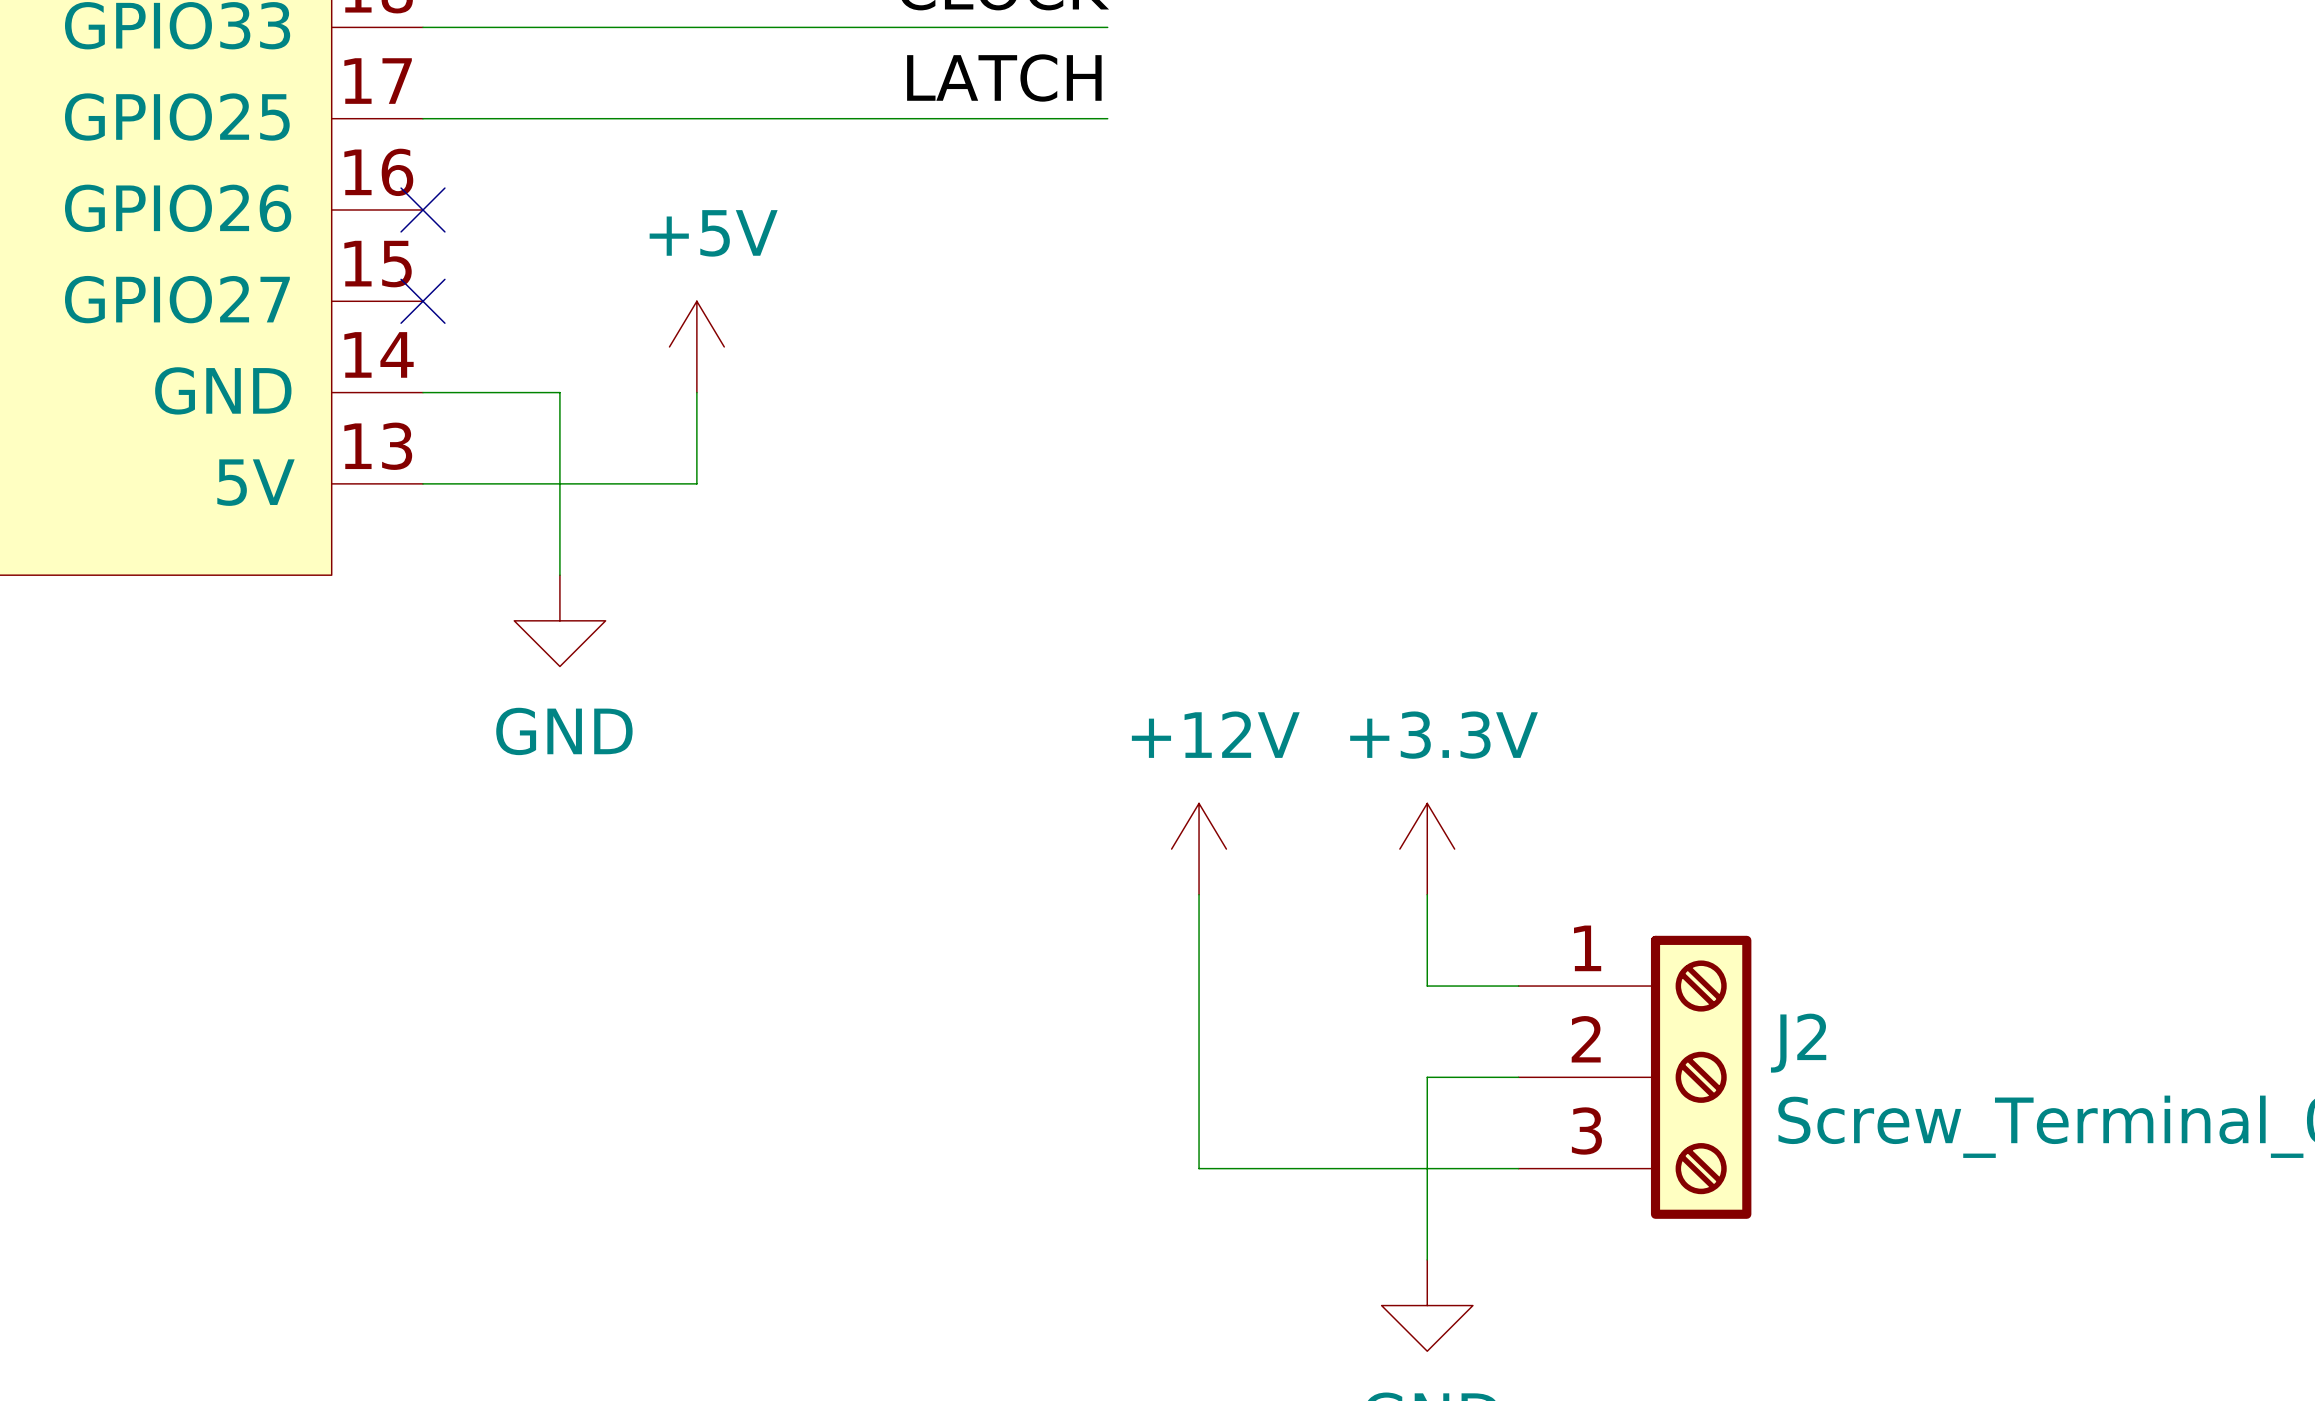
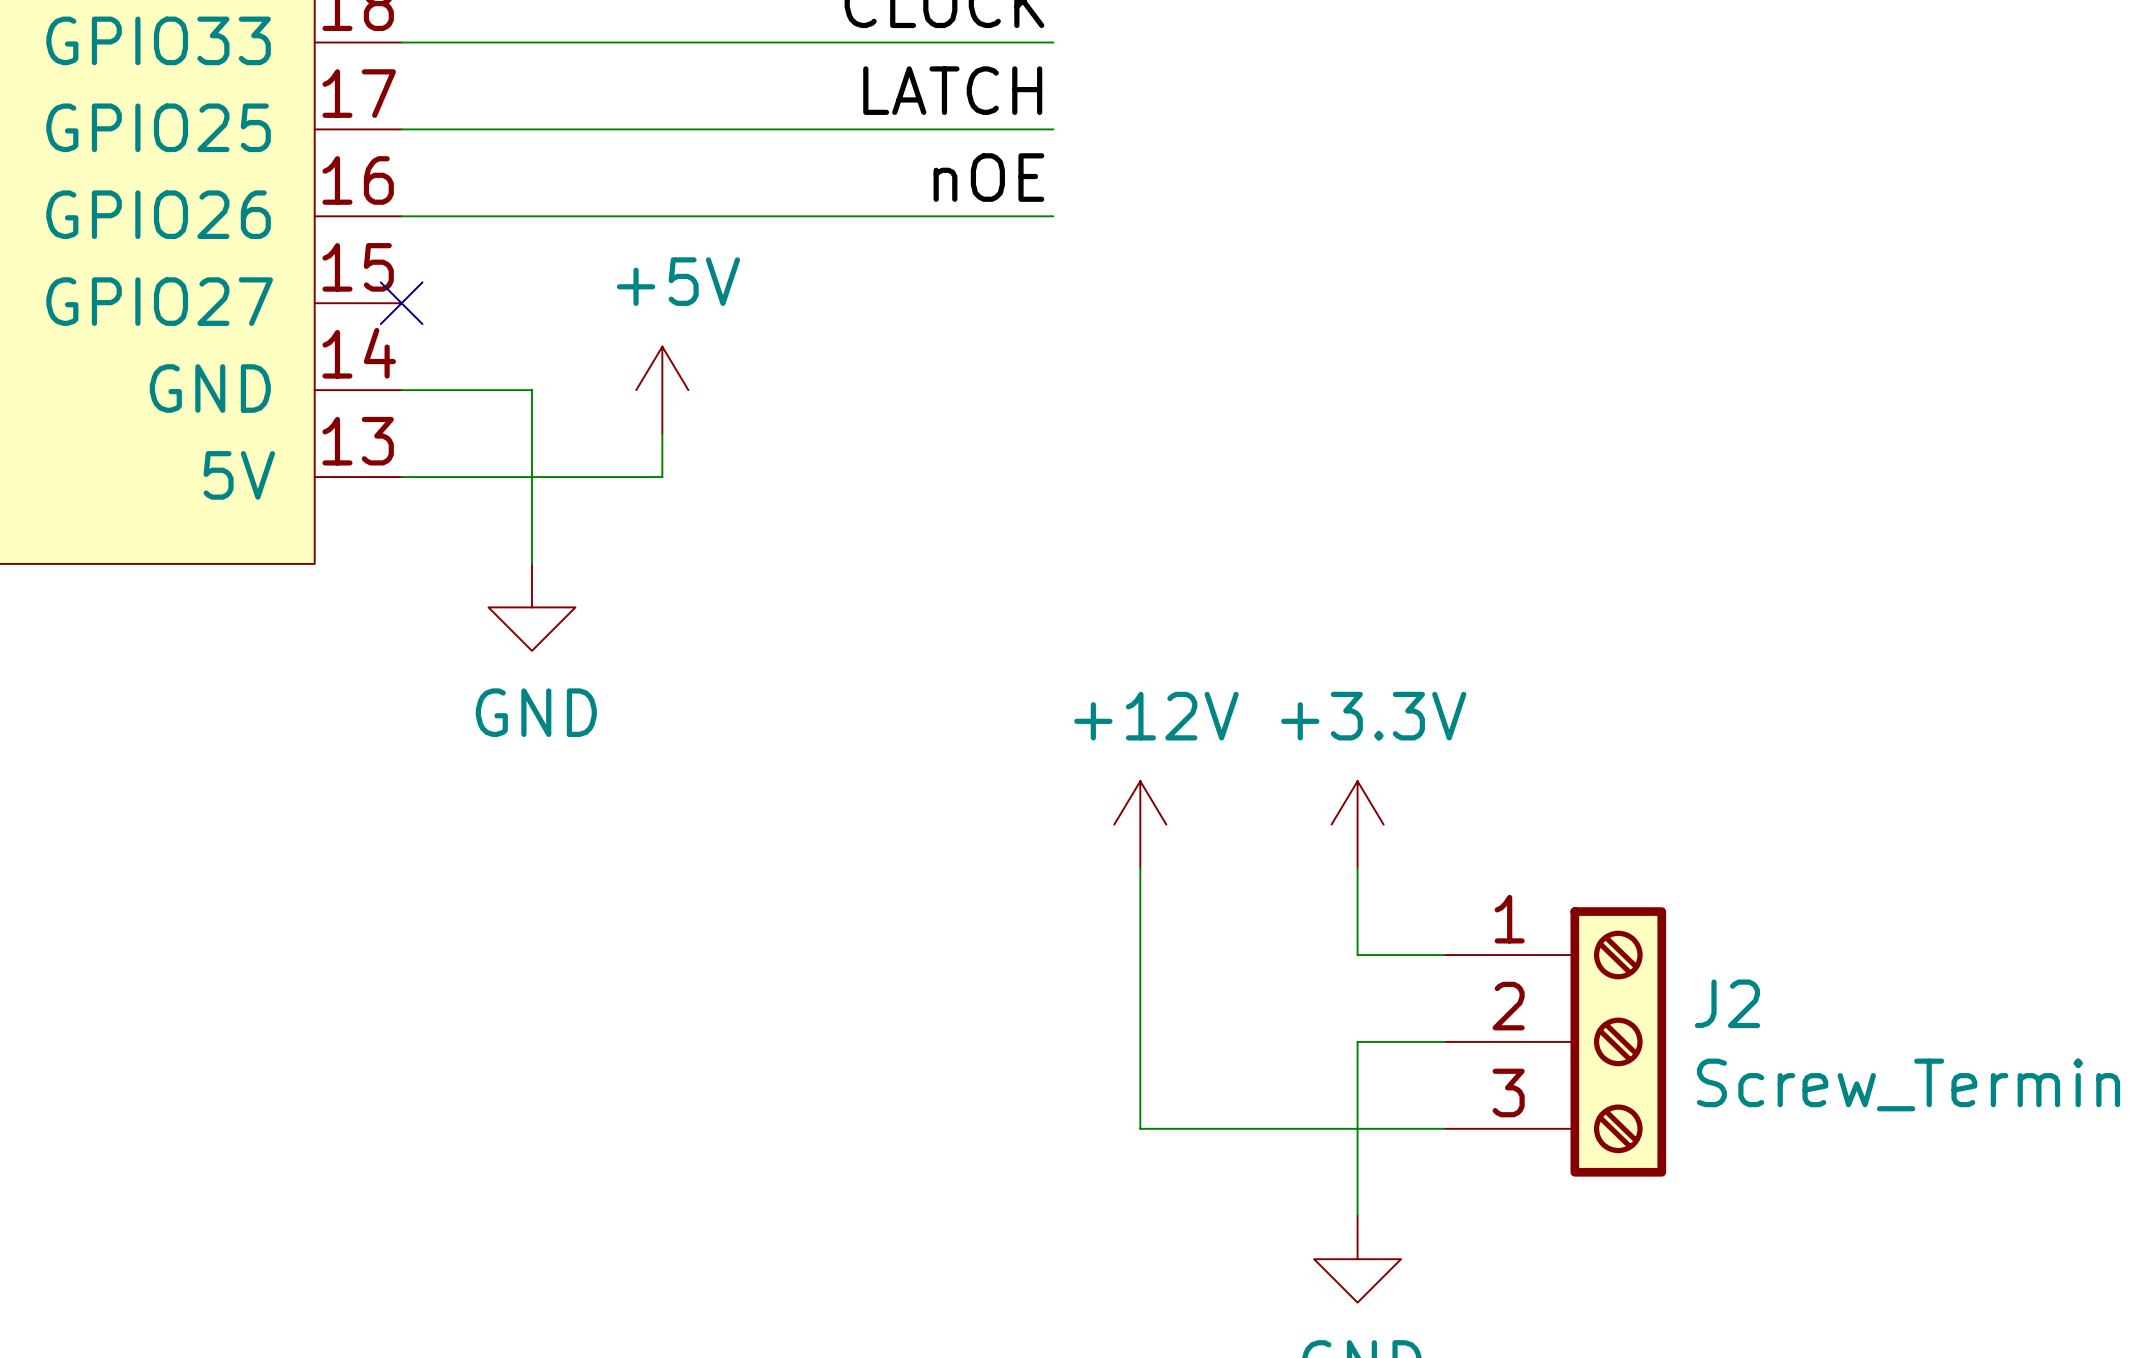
label: none -> nOE (988, 177)
wire: none -> (401, 216) (1053, 216)
no-connect mark: (422, 209) -> none
power symbol position: +5V (696, 346) -> +5V (662, 390)

